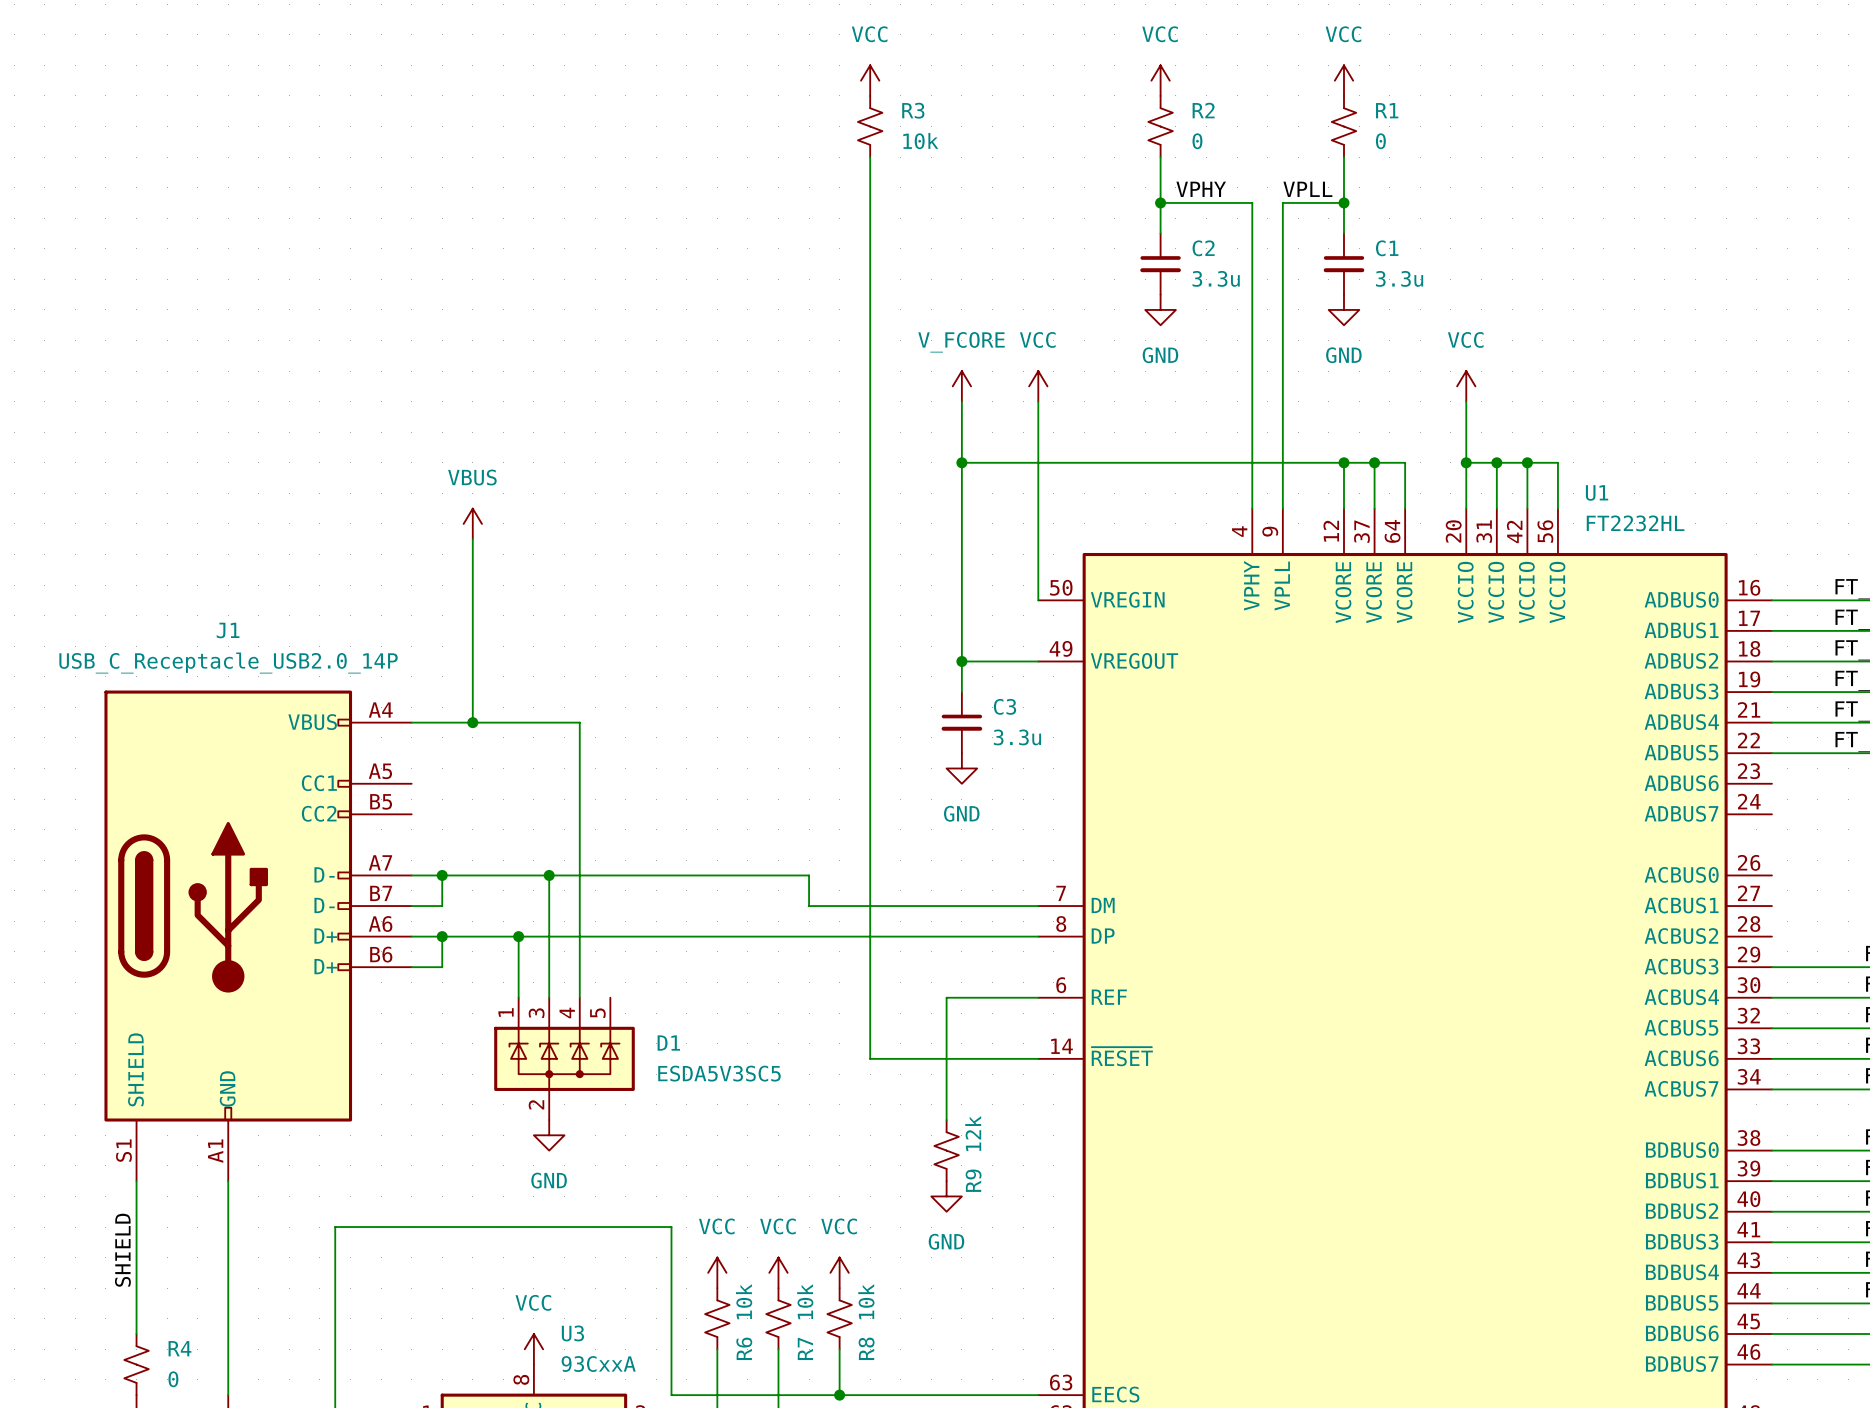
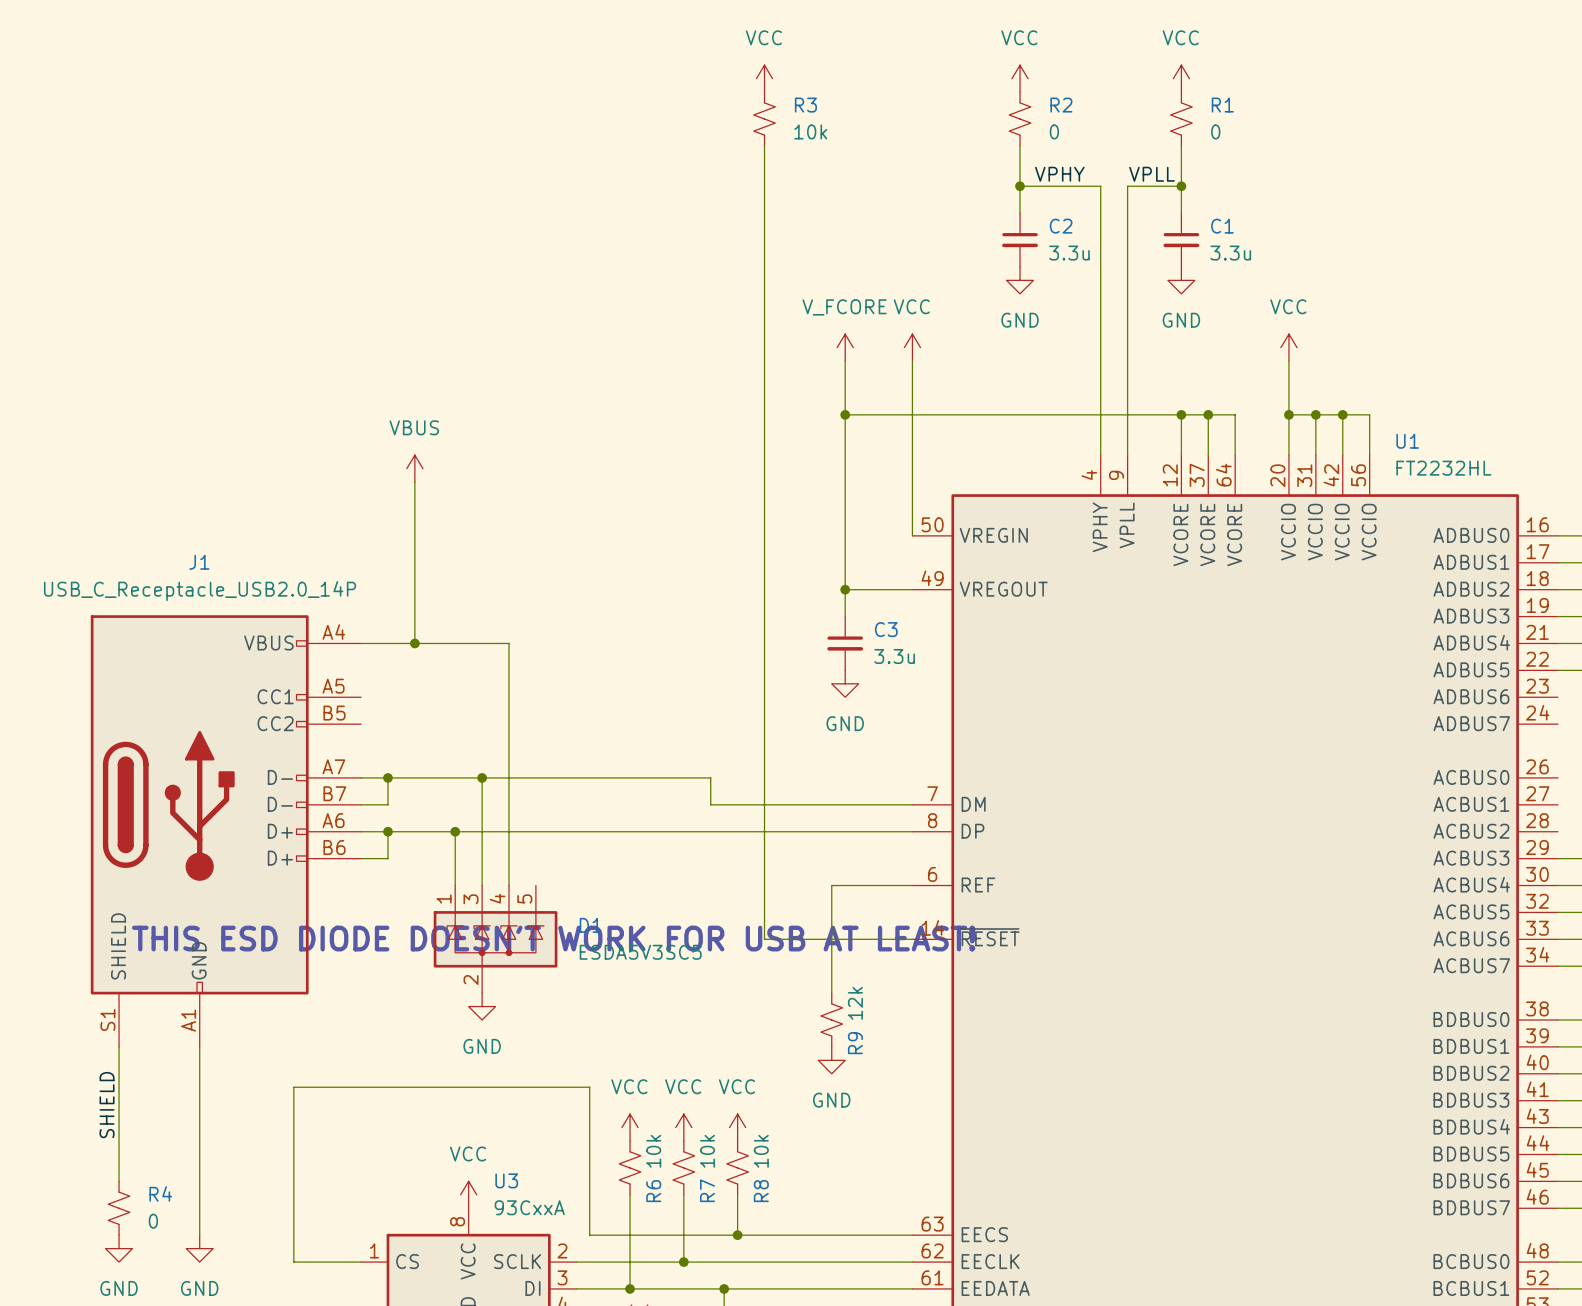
text: none -> THIS ESD DIODE DOESN'T WORK FOR USB AT LEAST! (553, 938)

